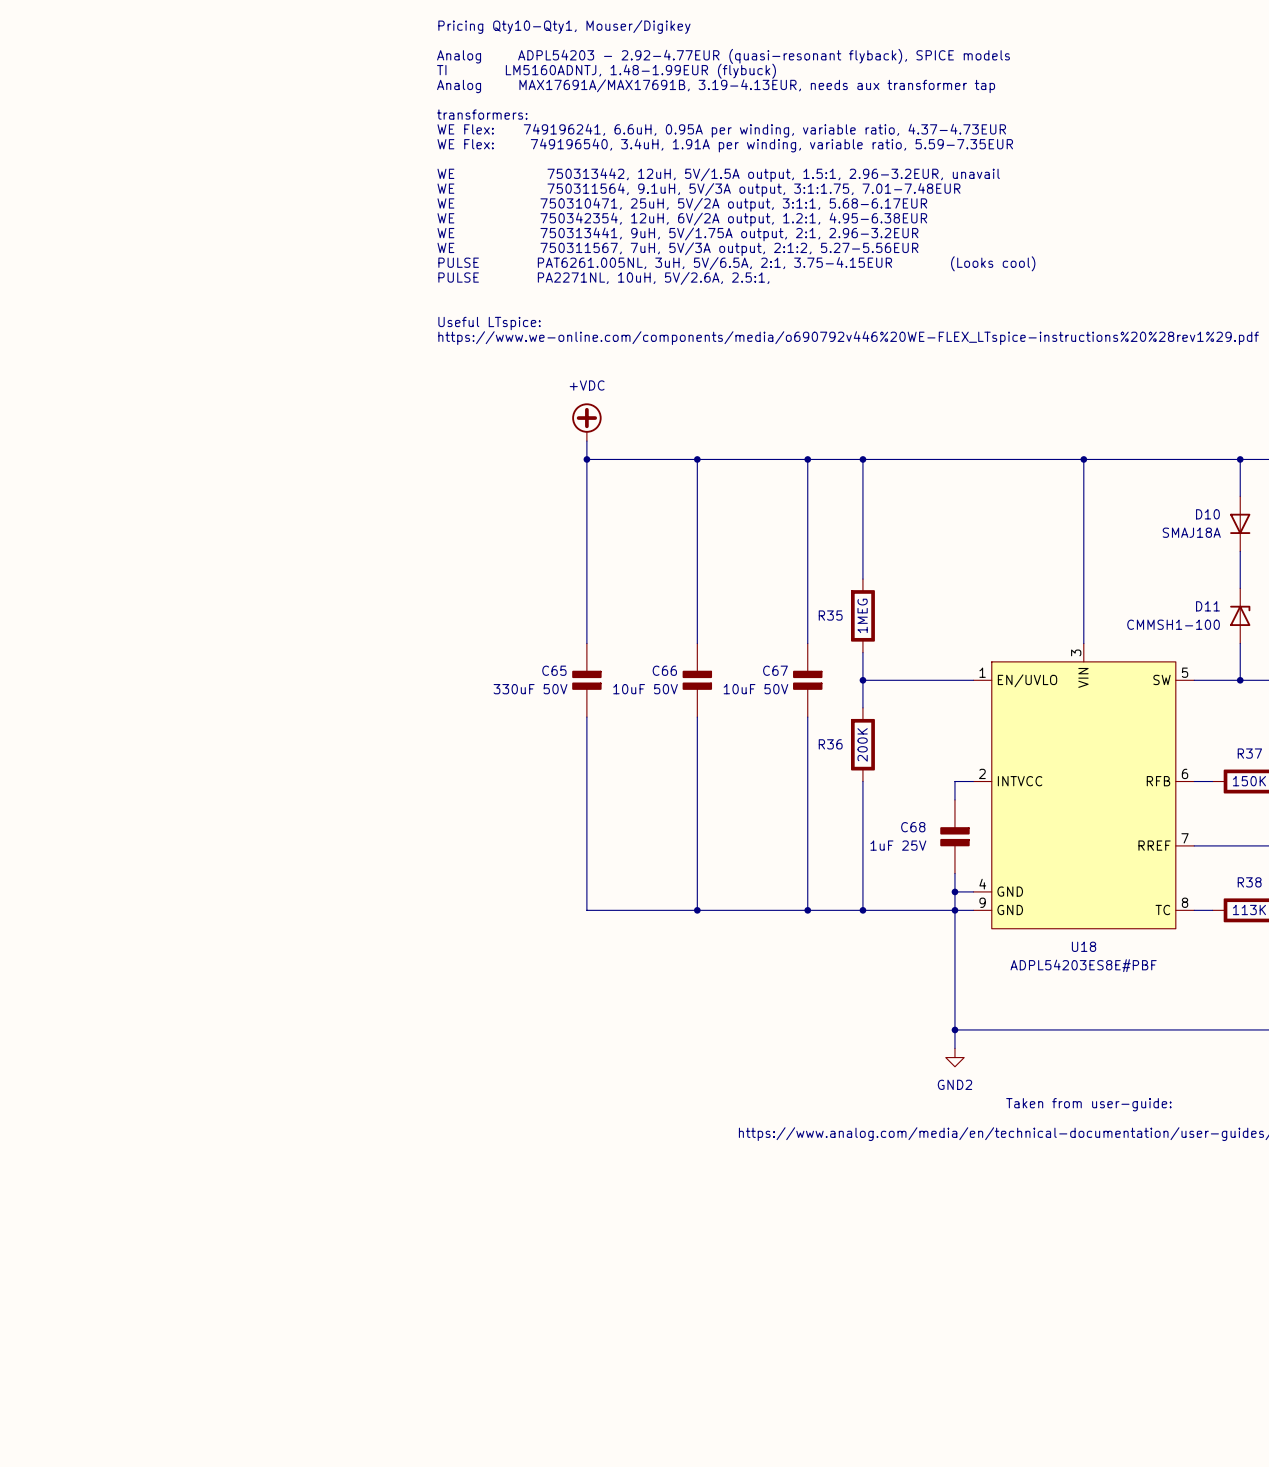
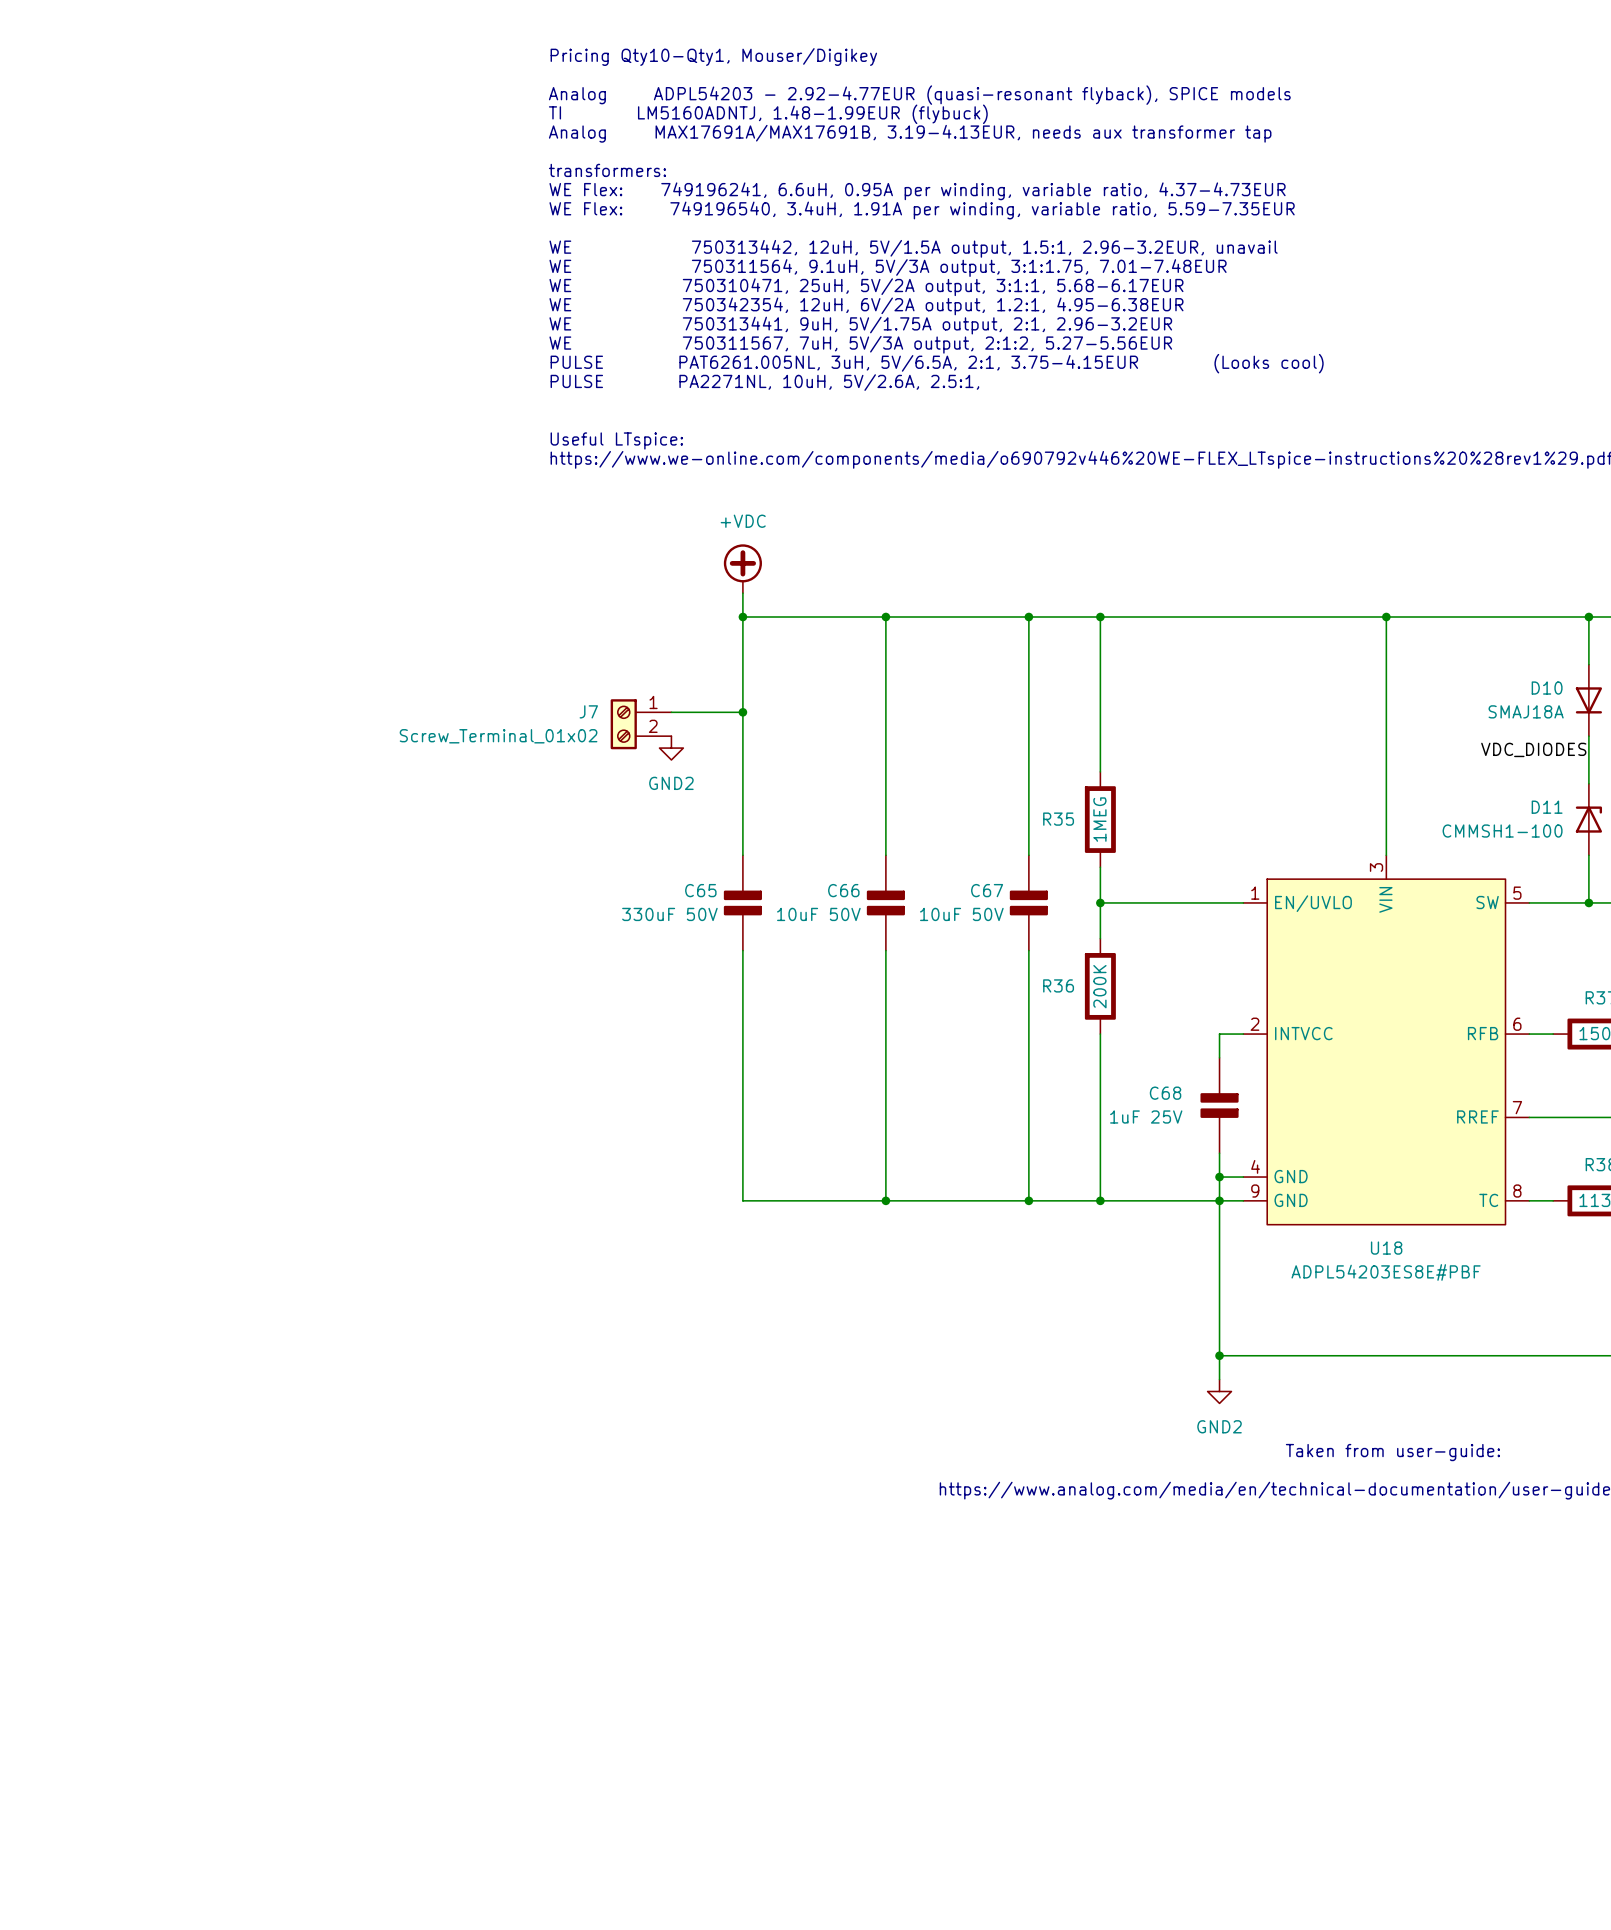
wire: none -> (671, 712) (742, 712)
junction: none -> (742, 712)
J7: none -> Screw_Terminal_01x02 (641, 724)
power symbol: none -> GND2 (671, 748)
label: none -> VDC_DIODES (1533, 749)

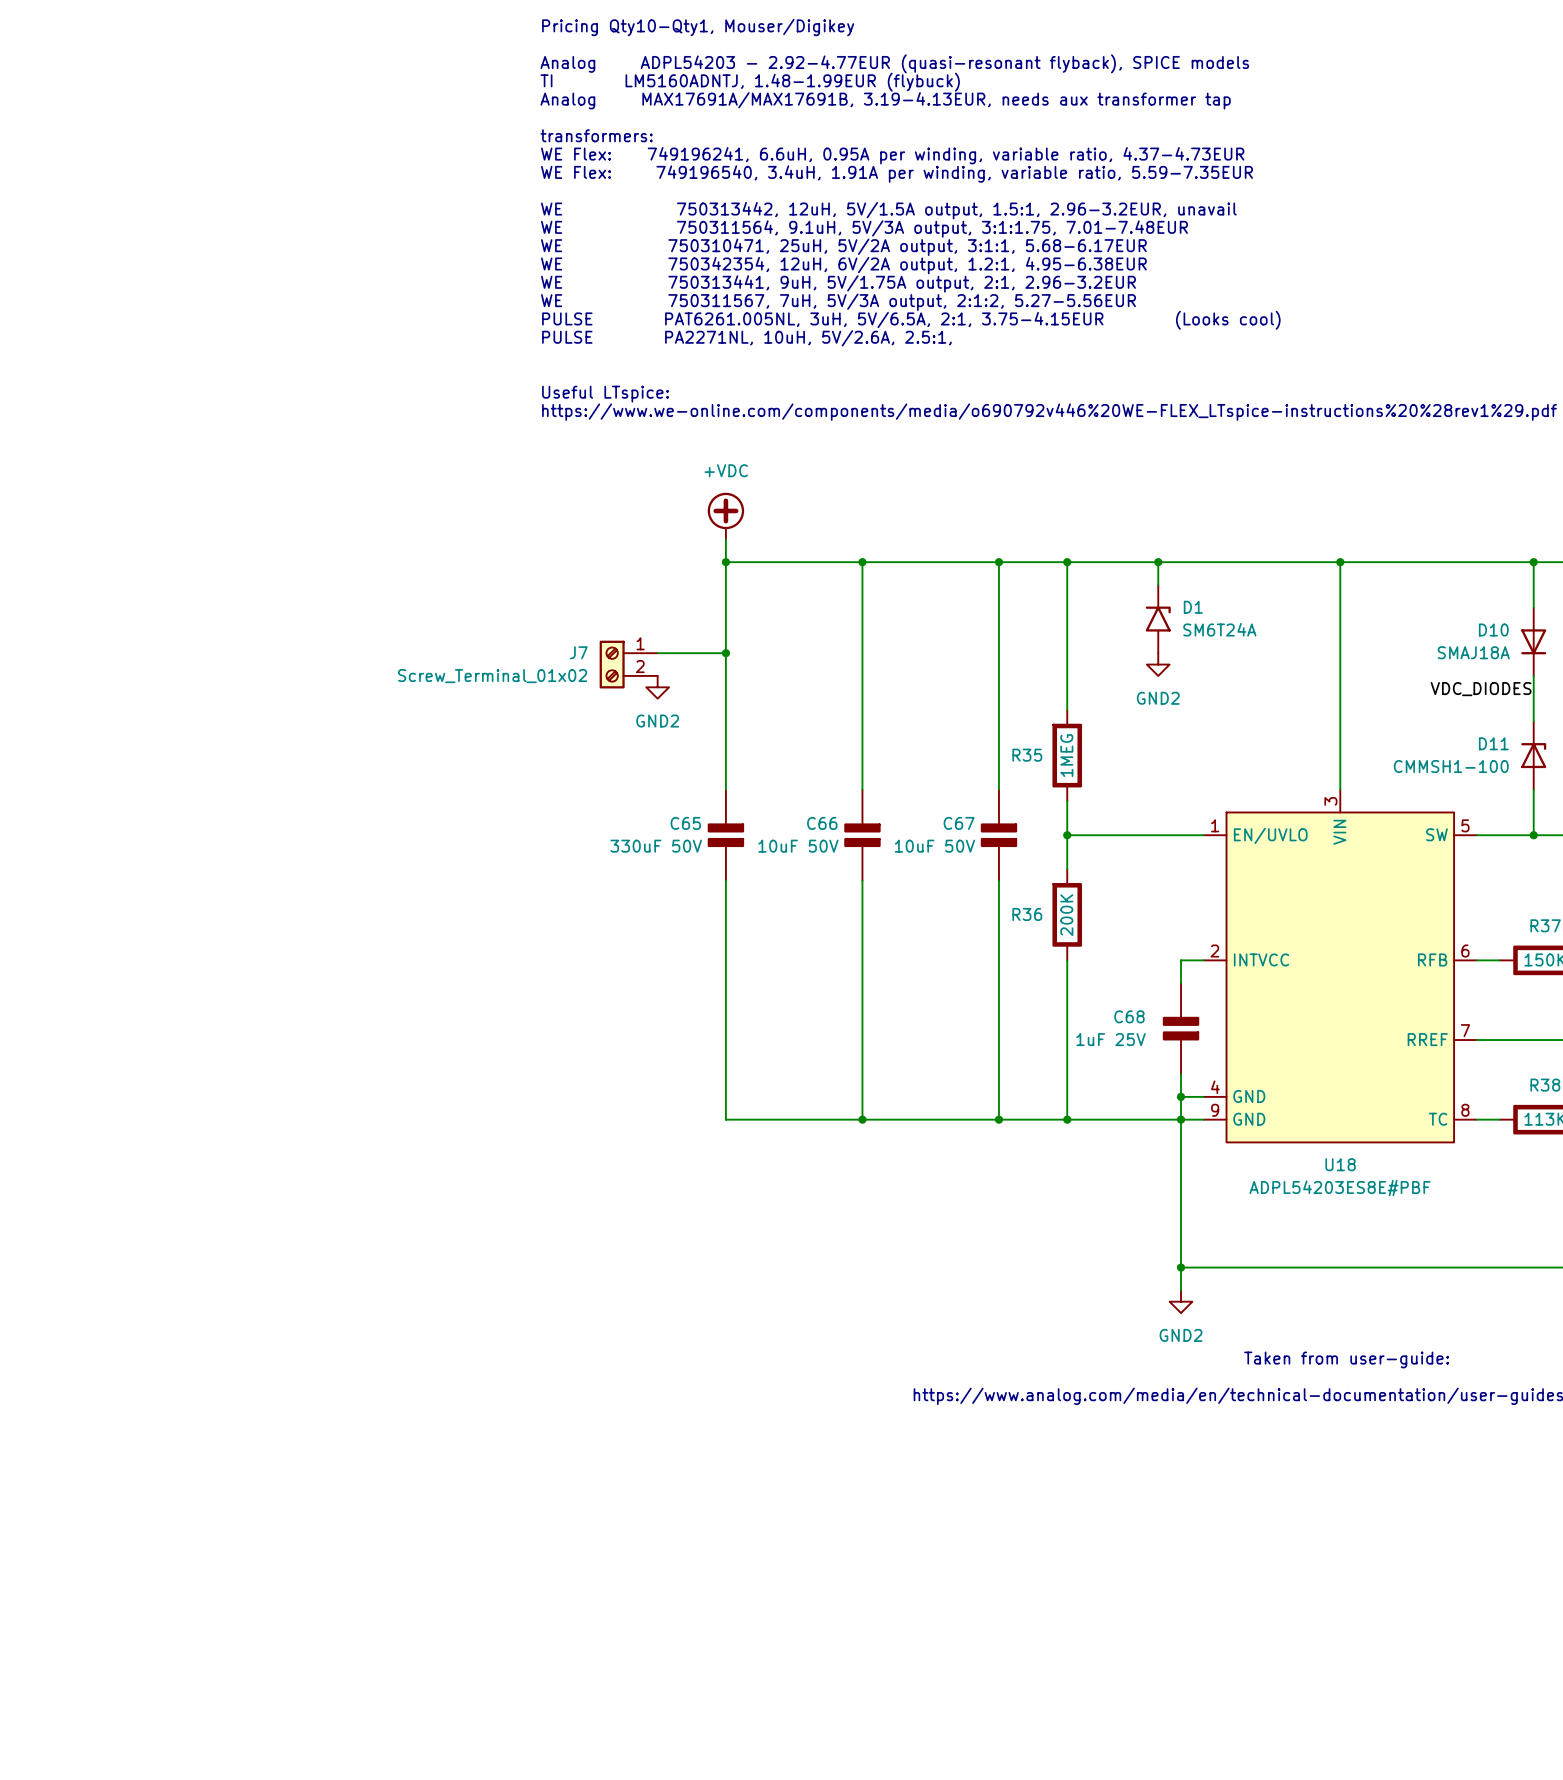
wire: none -> (1158, 562) (1158, 584)
junction: none -> (1158, 562)
D1: none -> SM6T24A (1158, 619)
power symbol: none -> GND2 (1158, 664)

